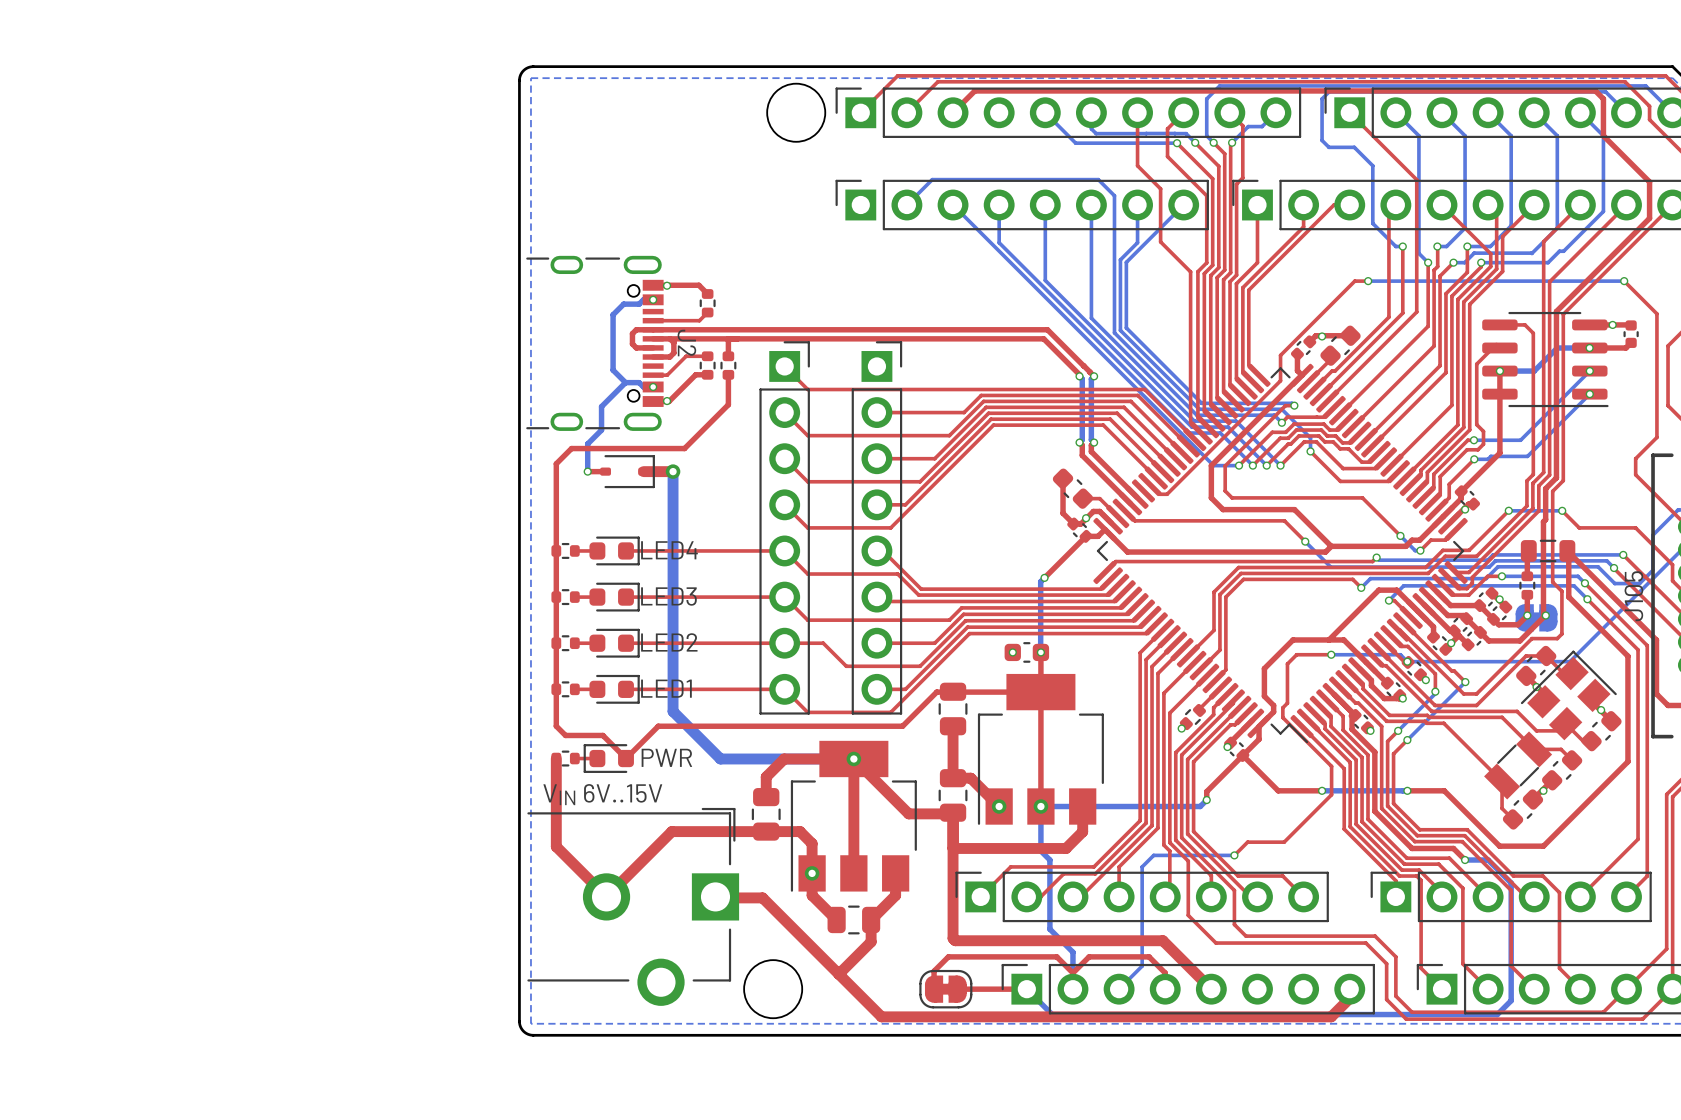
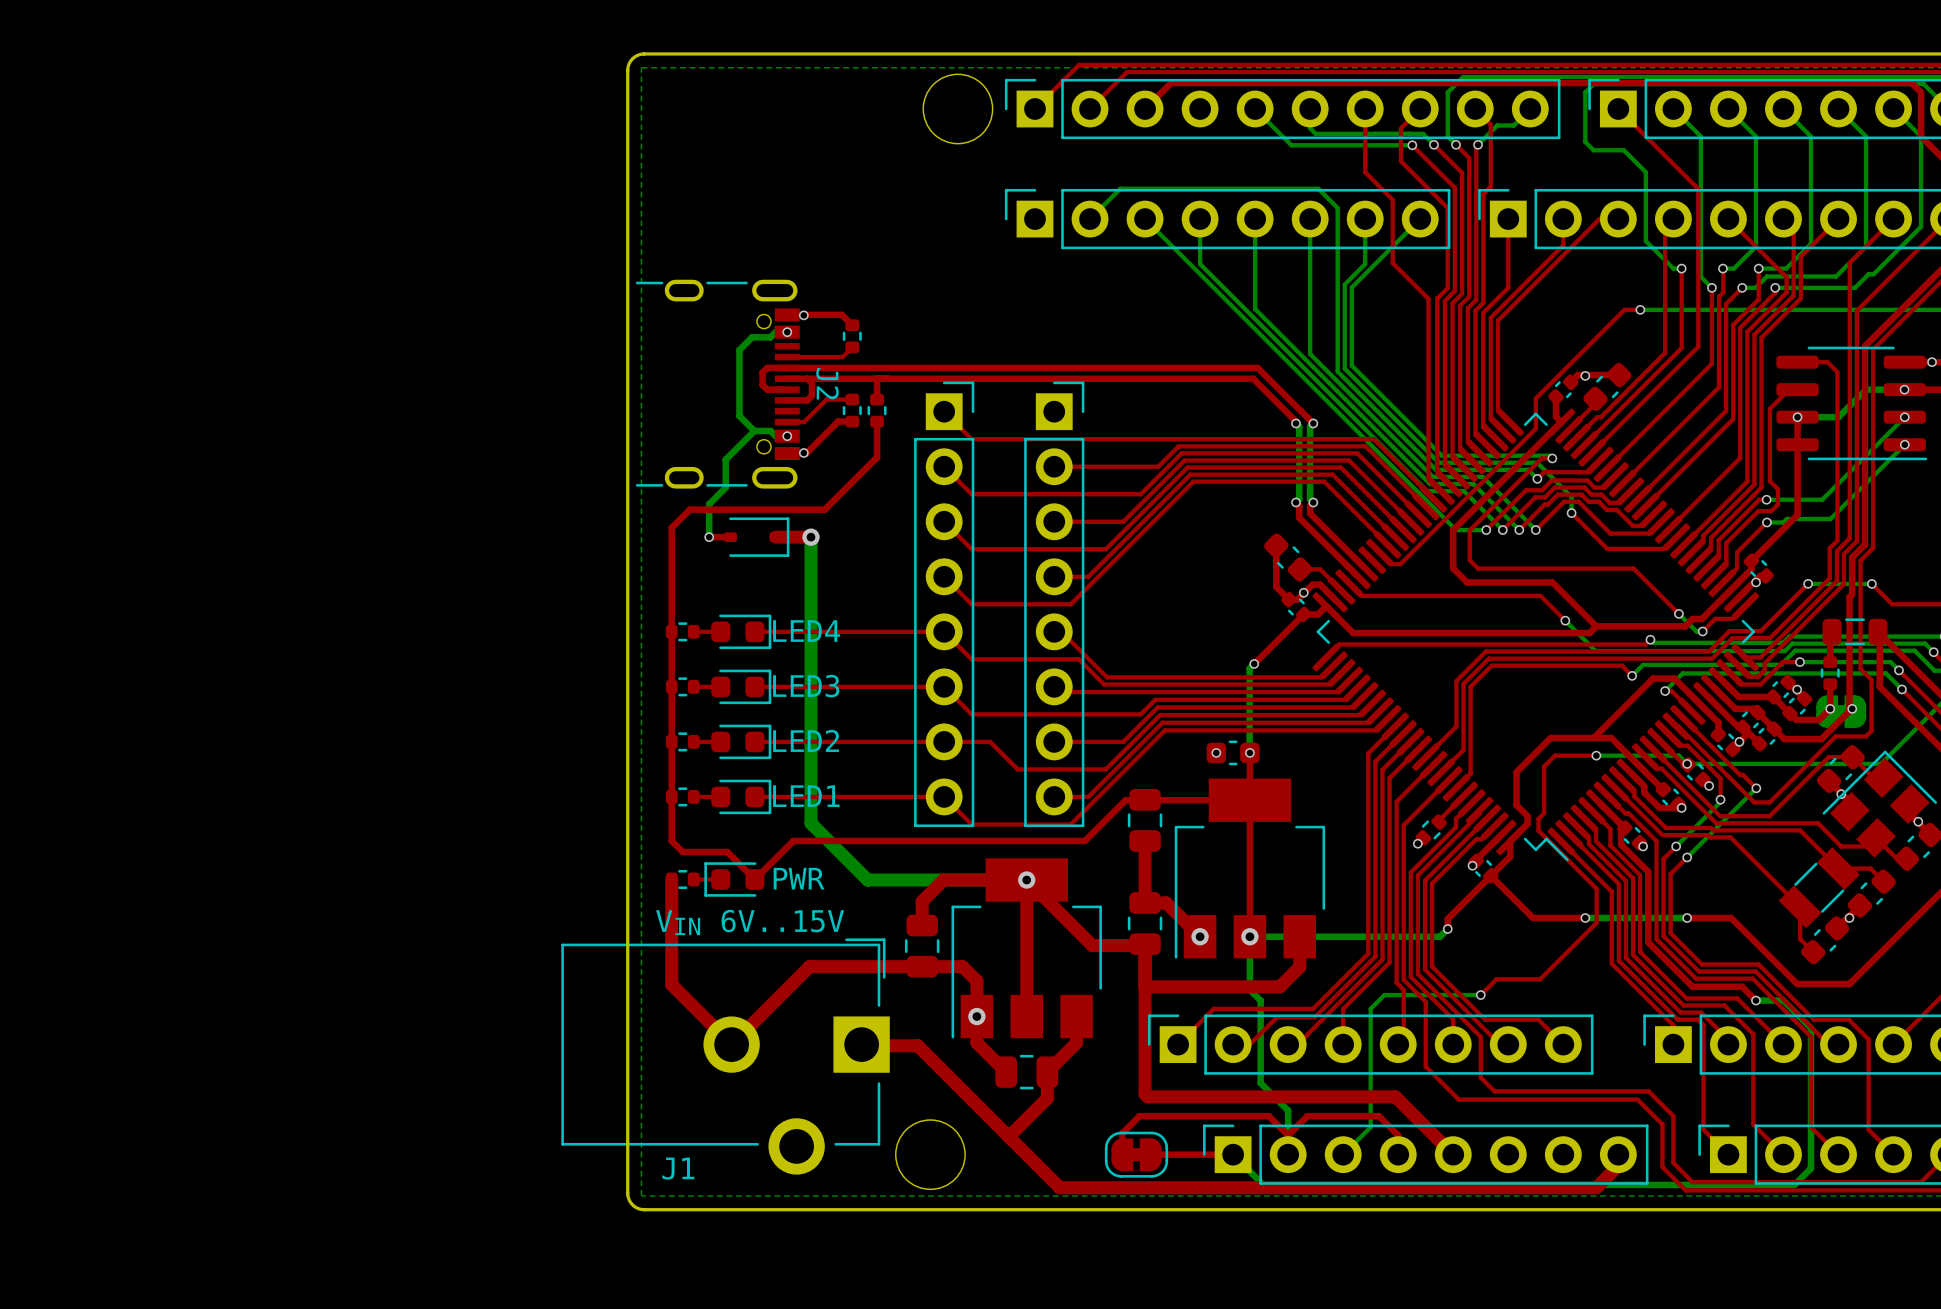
J1: none -> (725, 1056)
part: (633, 906) -> none

